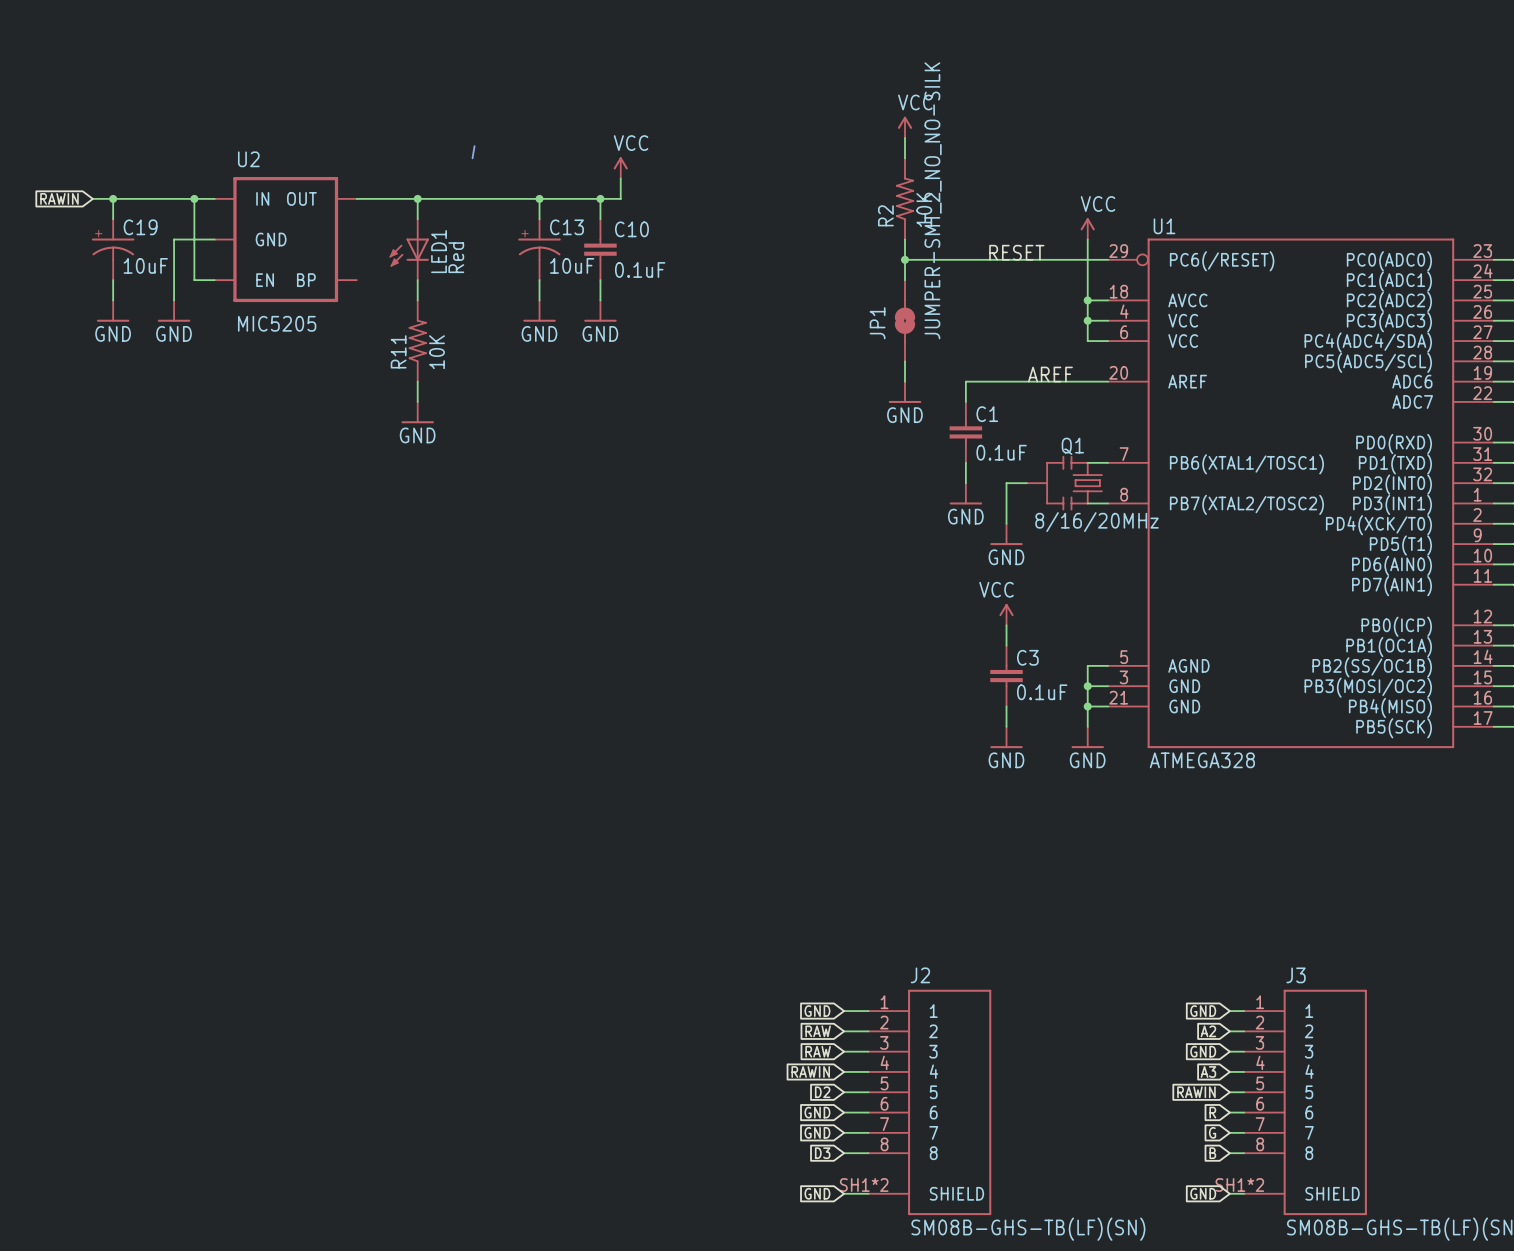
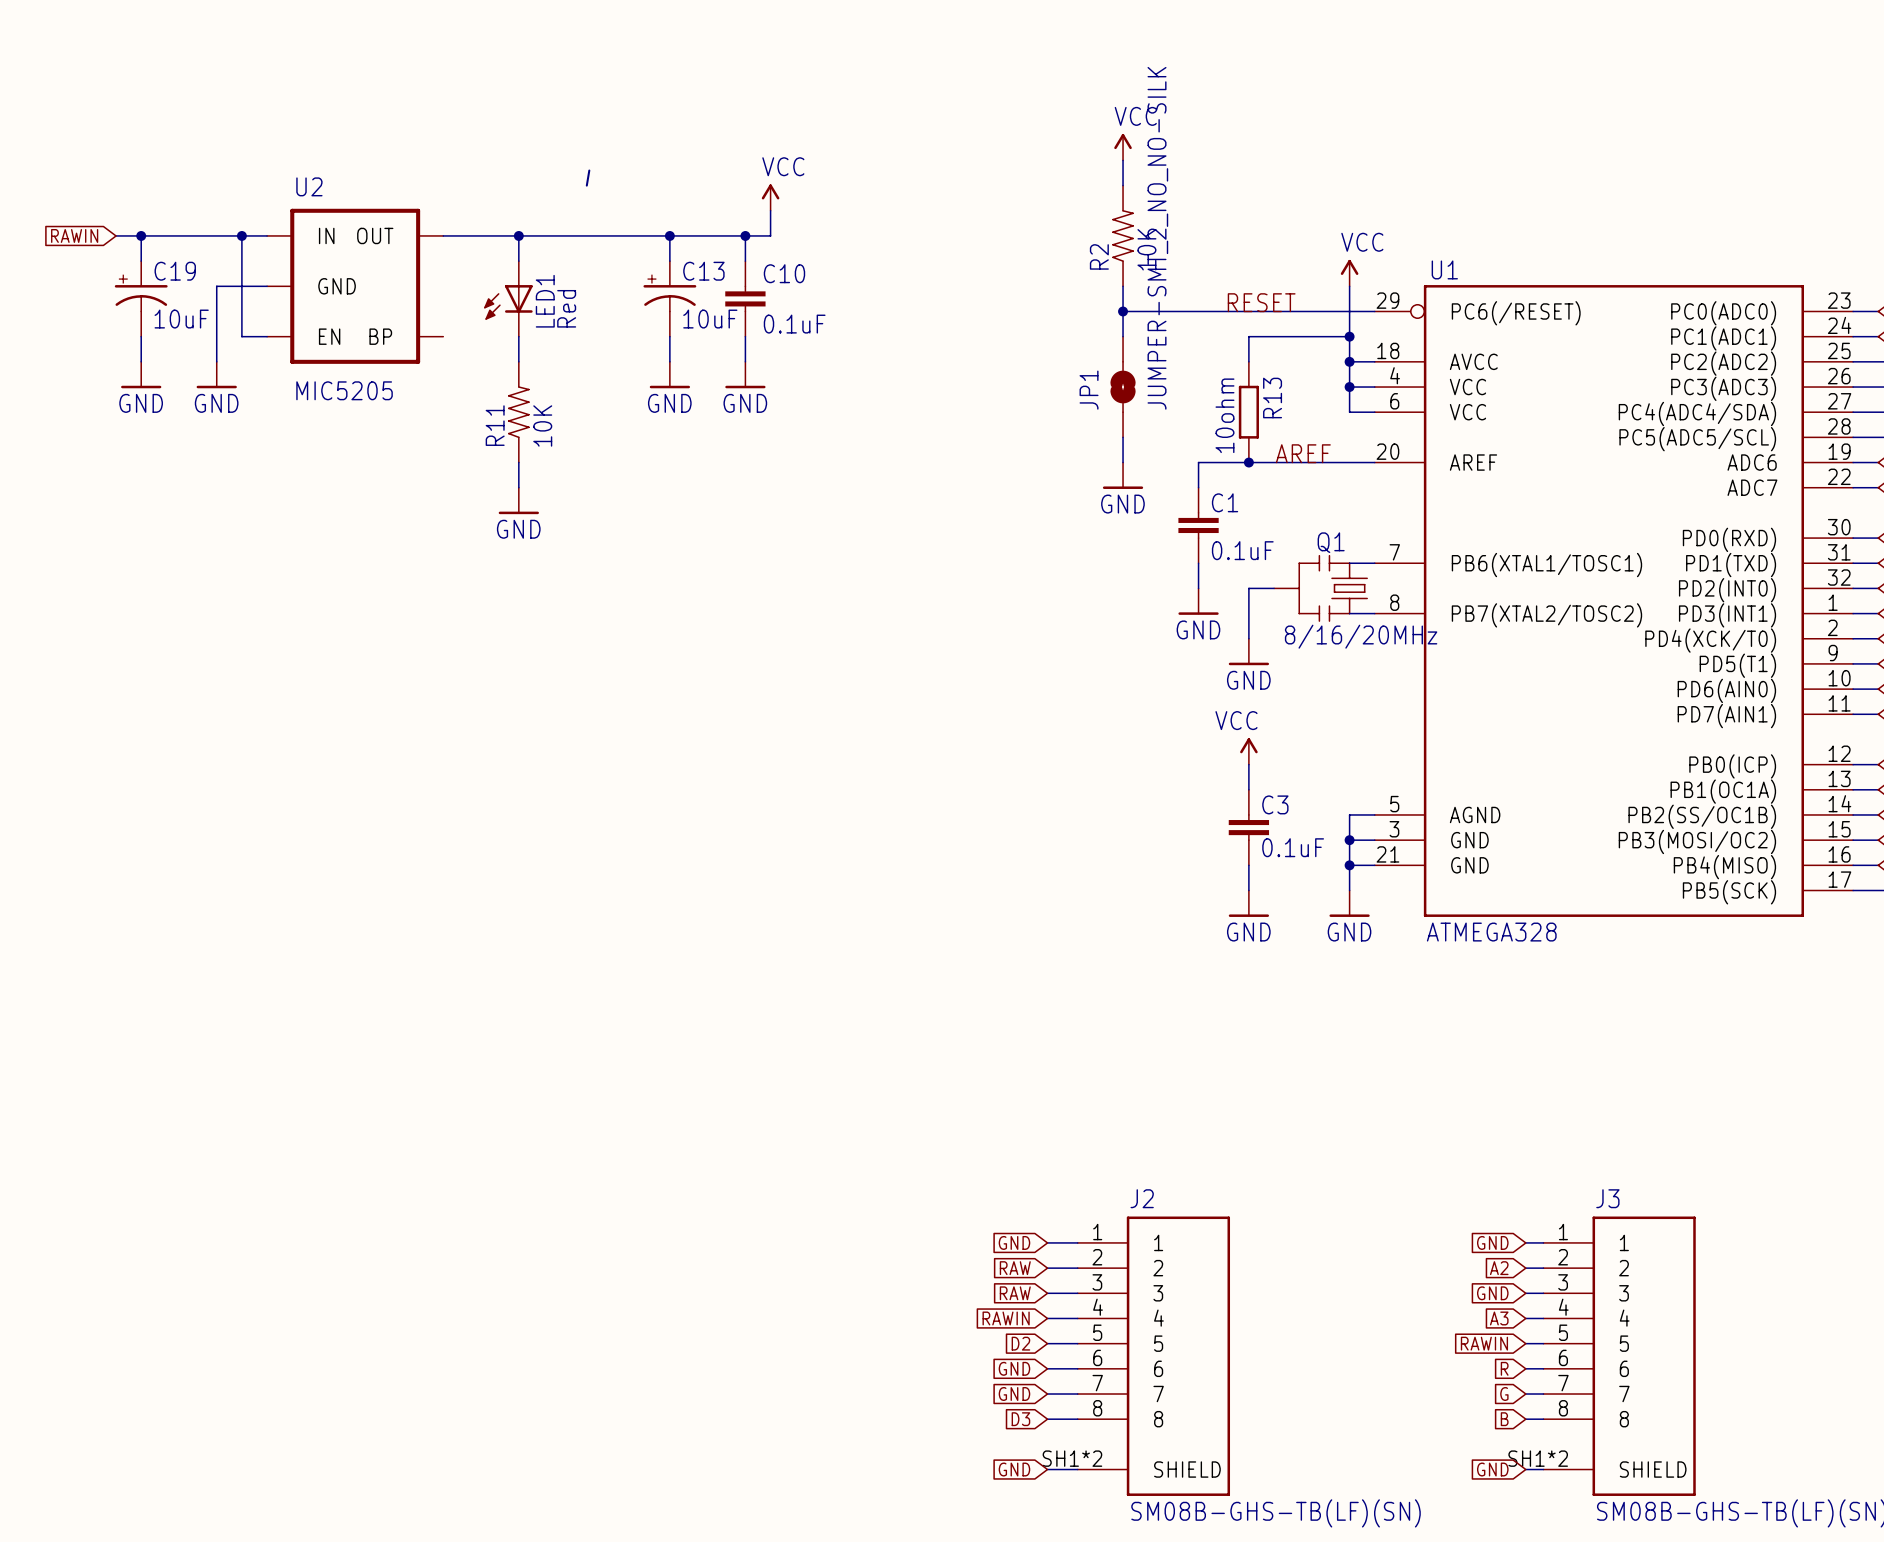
wire: none -> (1349, 336) (1248, 336) (1248, 361)
junction: none -> (1349, 336)
R13: none -> 10ohm (1248, 412)
junction: none -> (1248, 462)

